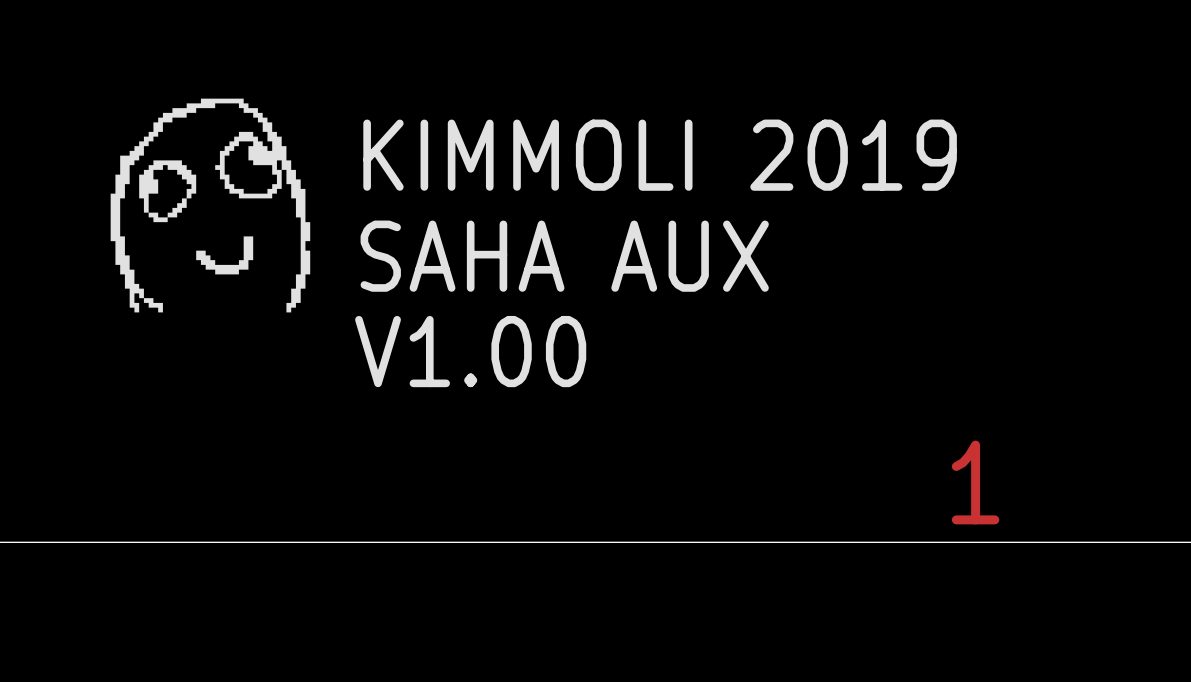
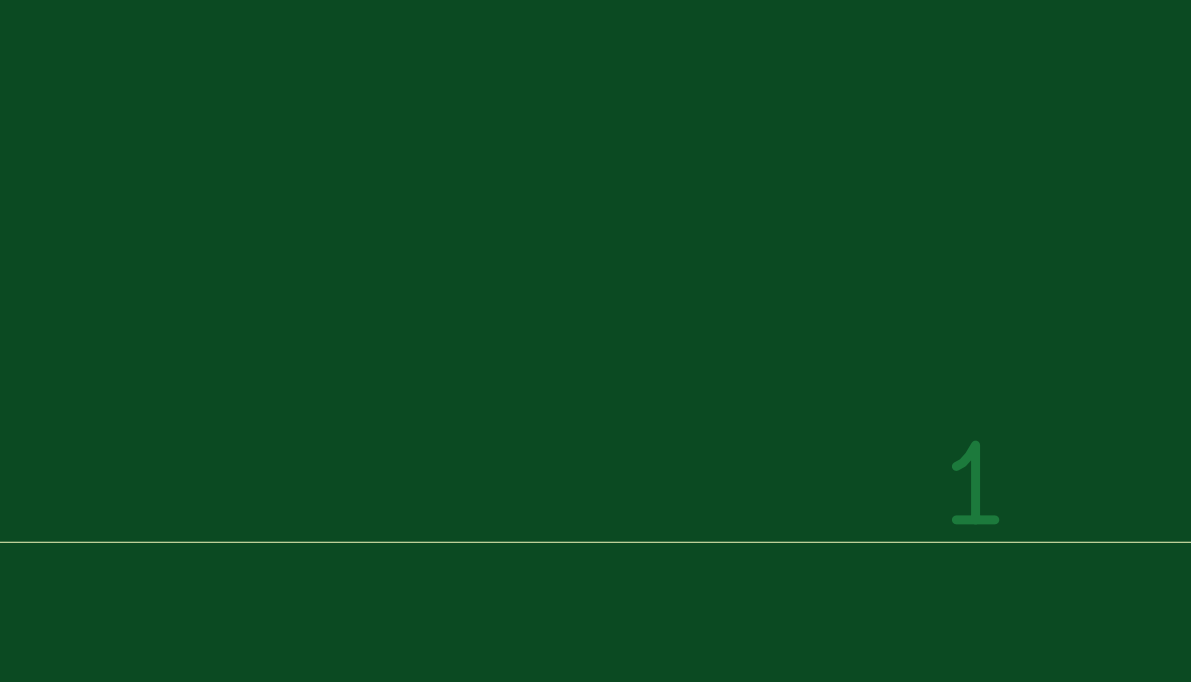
drawing: [110, 98, 311, 313] -> none
text: KIMMOLI 2019 (660, 155) -> none
text: SAHA AUX (564, 256) -> none
text: V1.00 (470, 351) -> none

